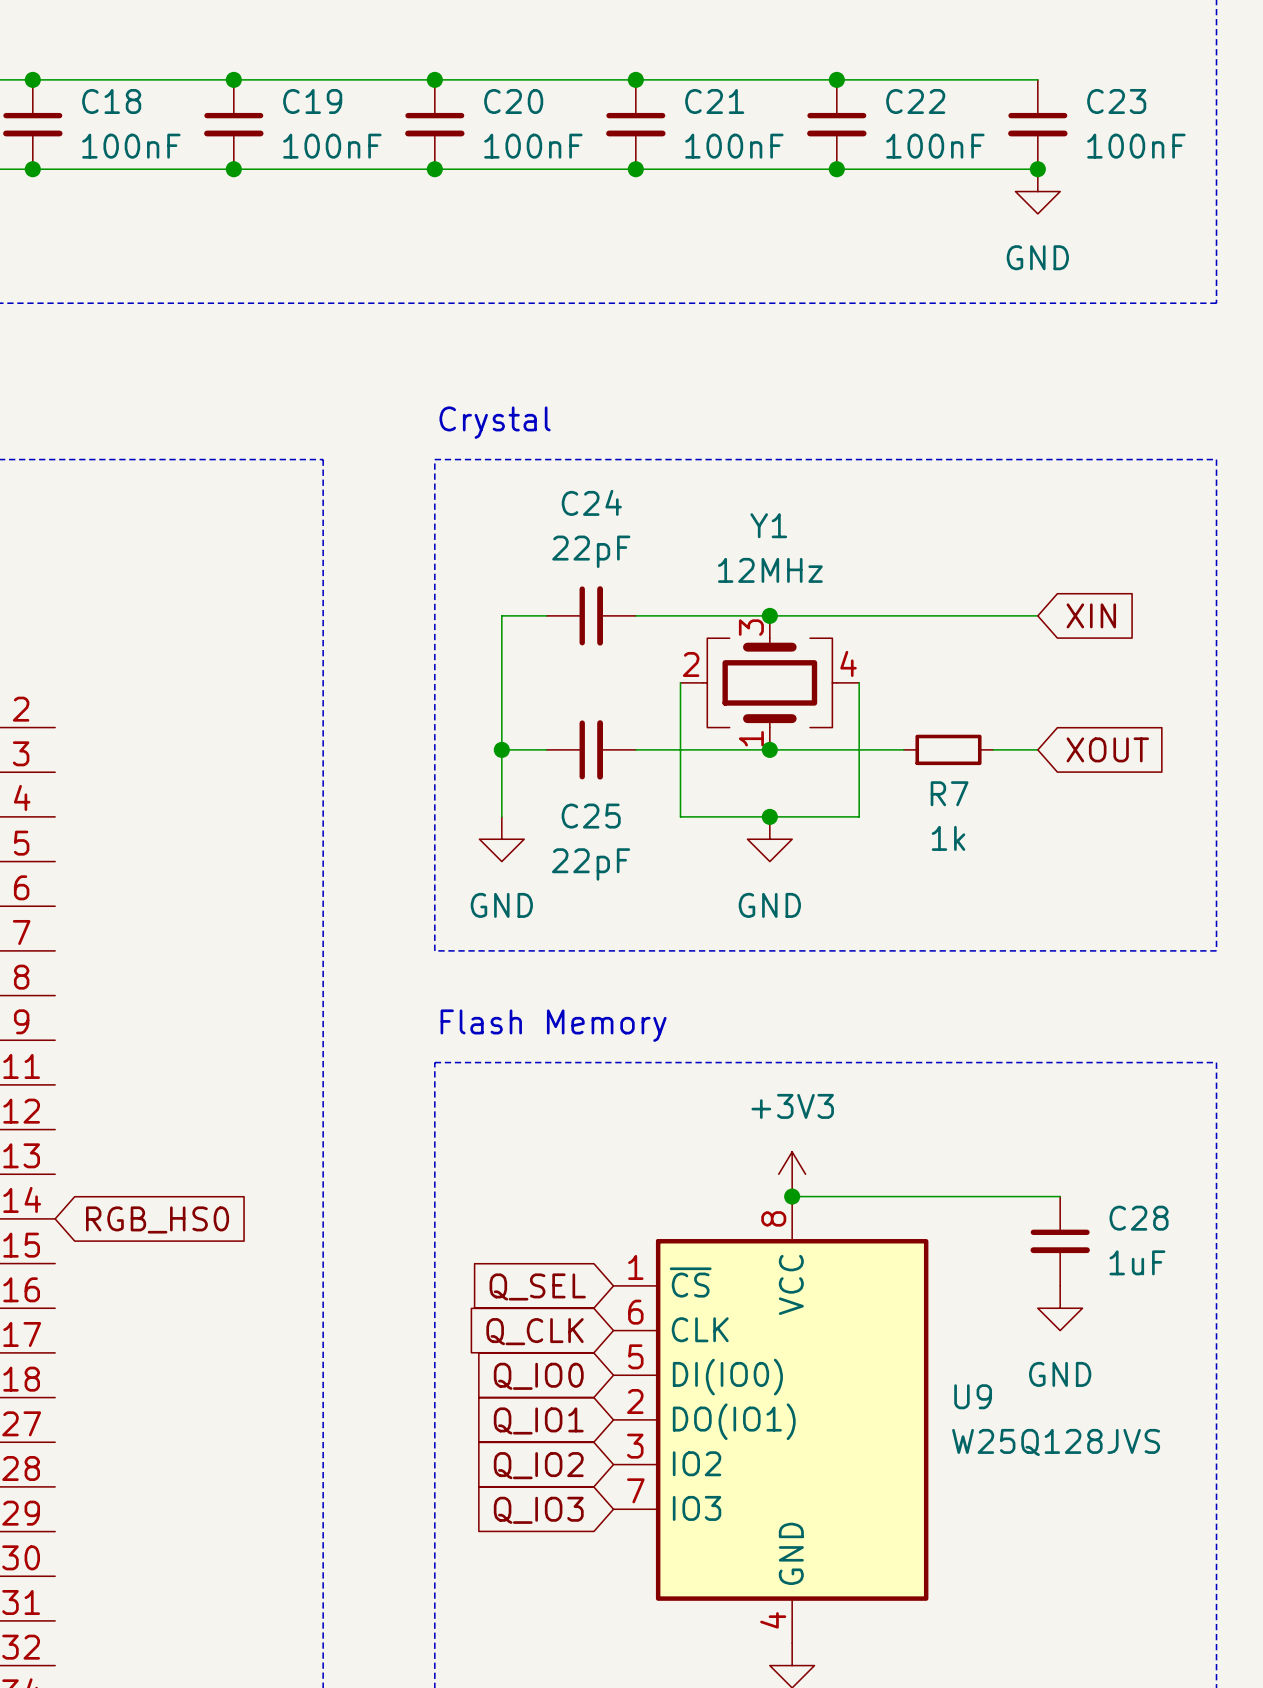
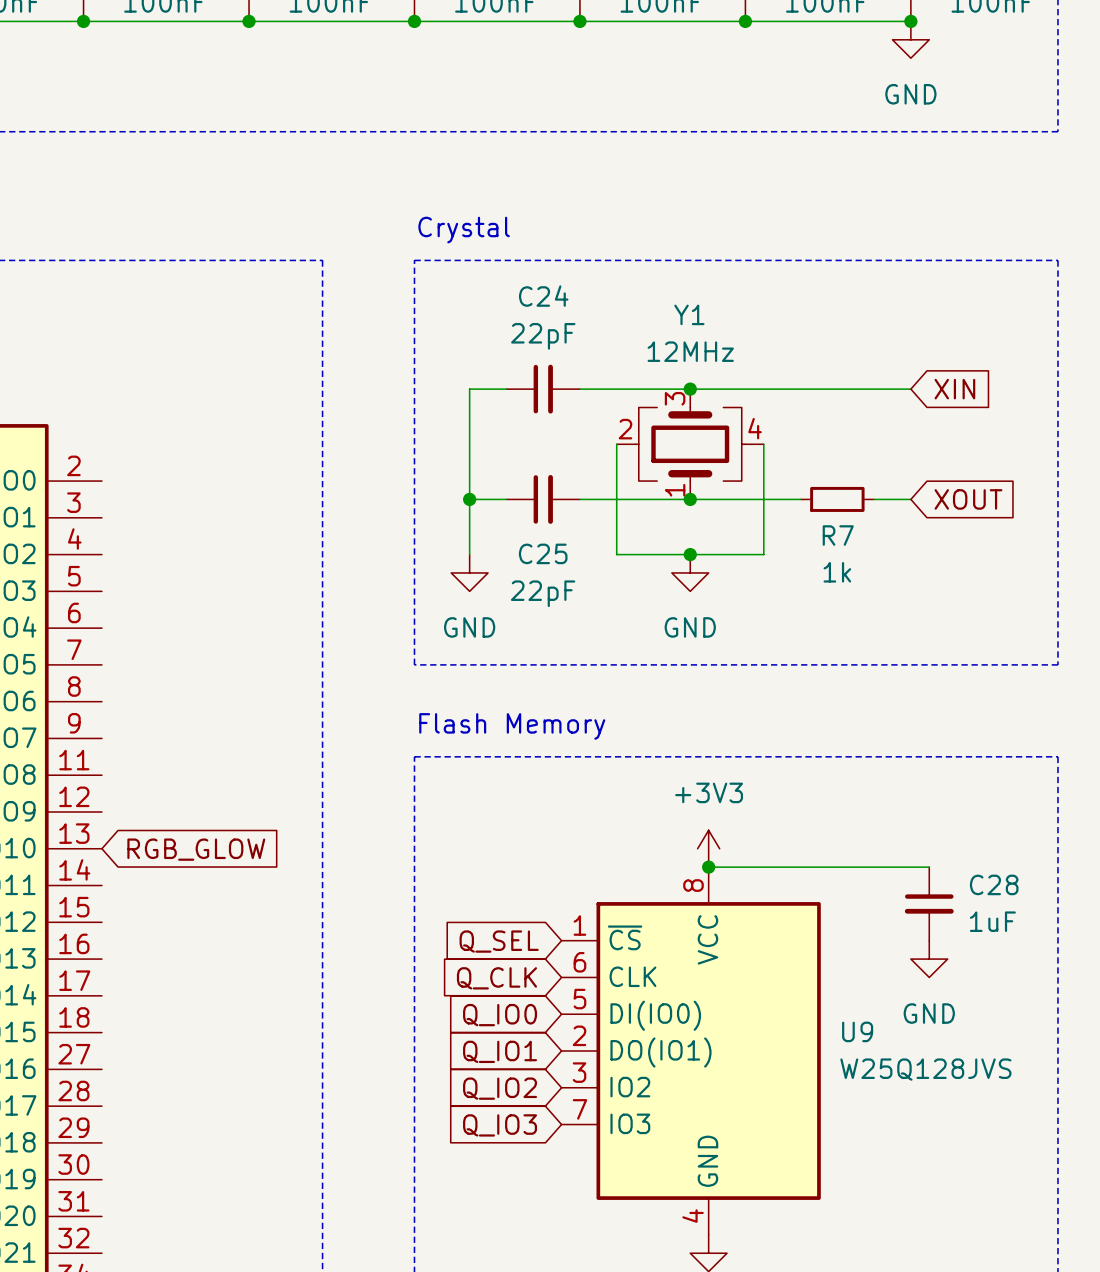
global label: none -> RGB_GLOW (196, 849)
global label: RGB_HS0 (157, 1219) -> none

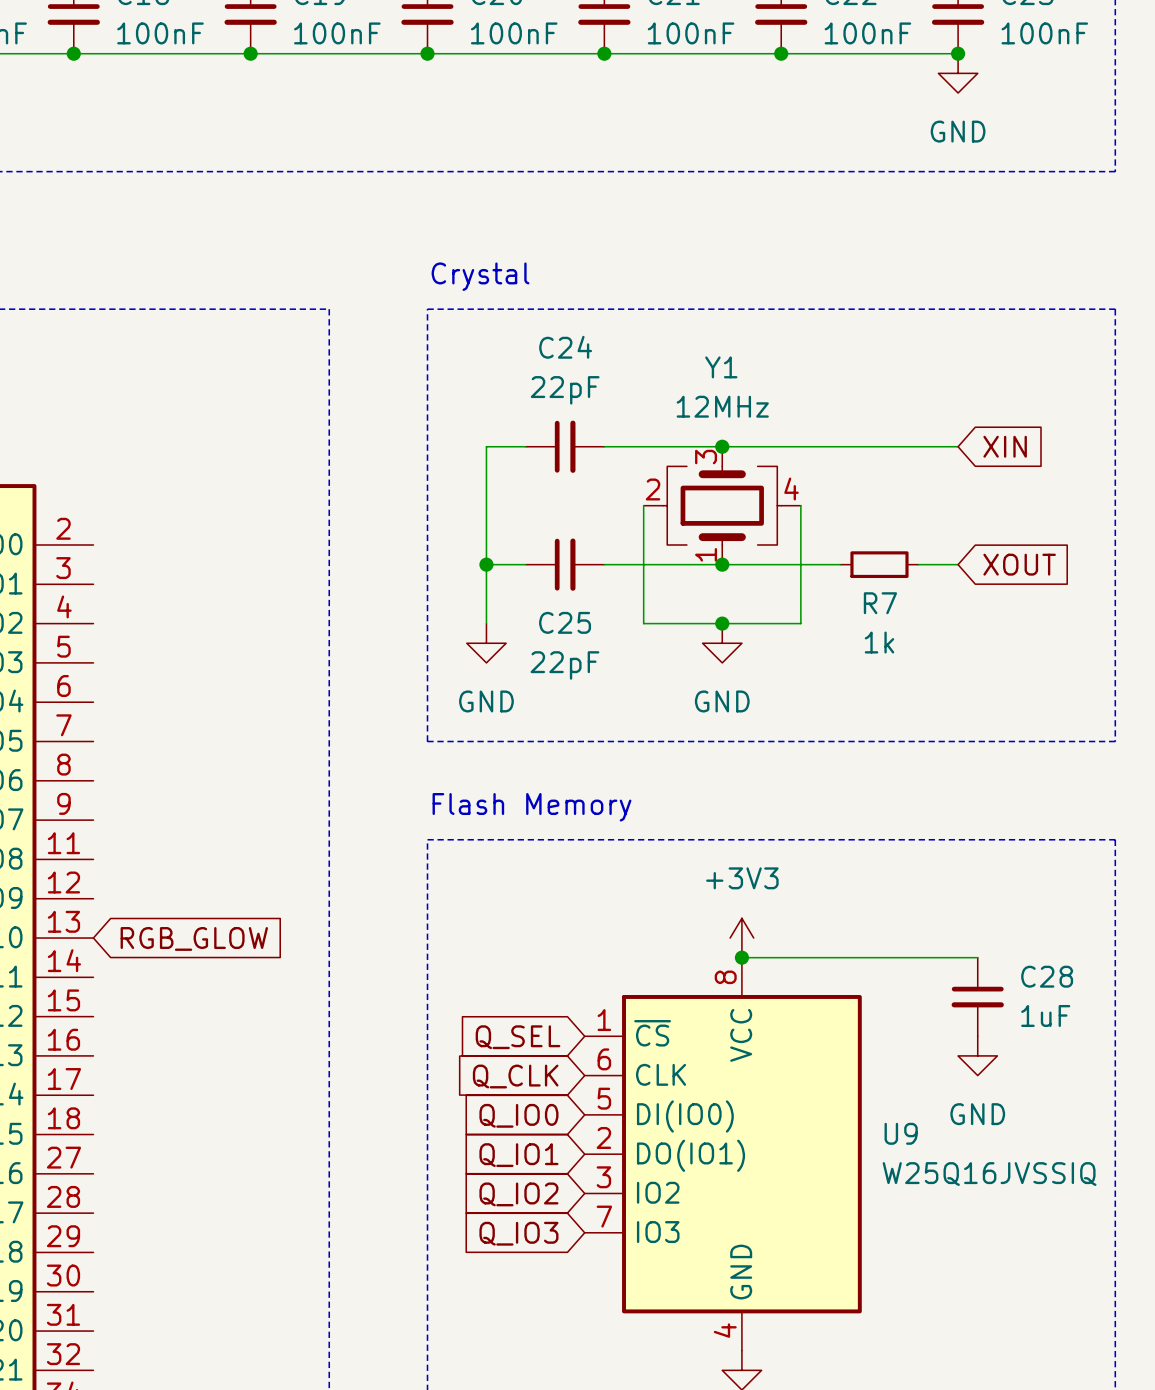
U9 value: W25Q128JVS (925, 1069) -> W25Q16JVSSIQ (989, 1174)

